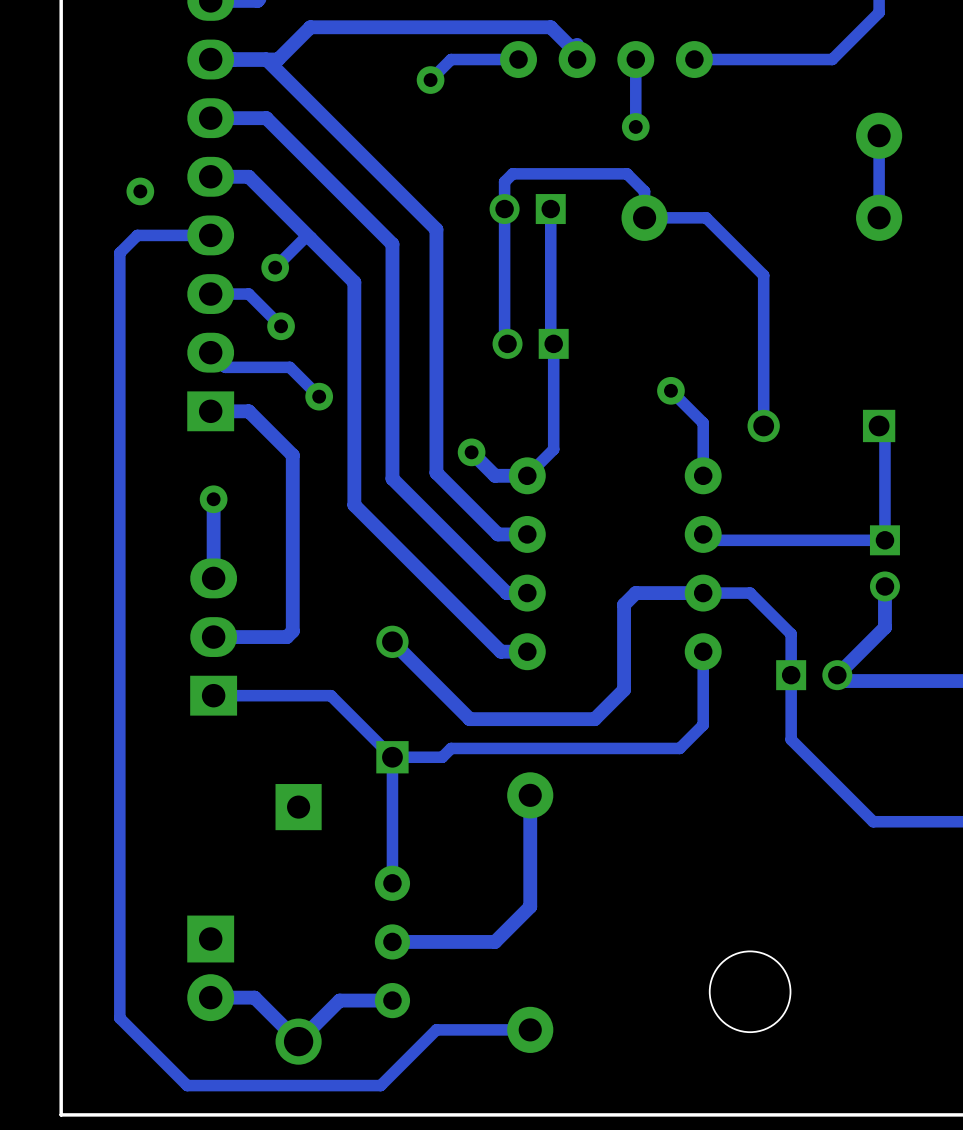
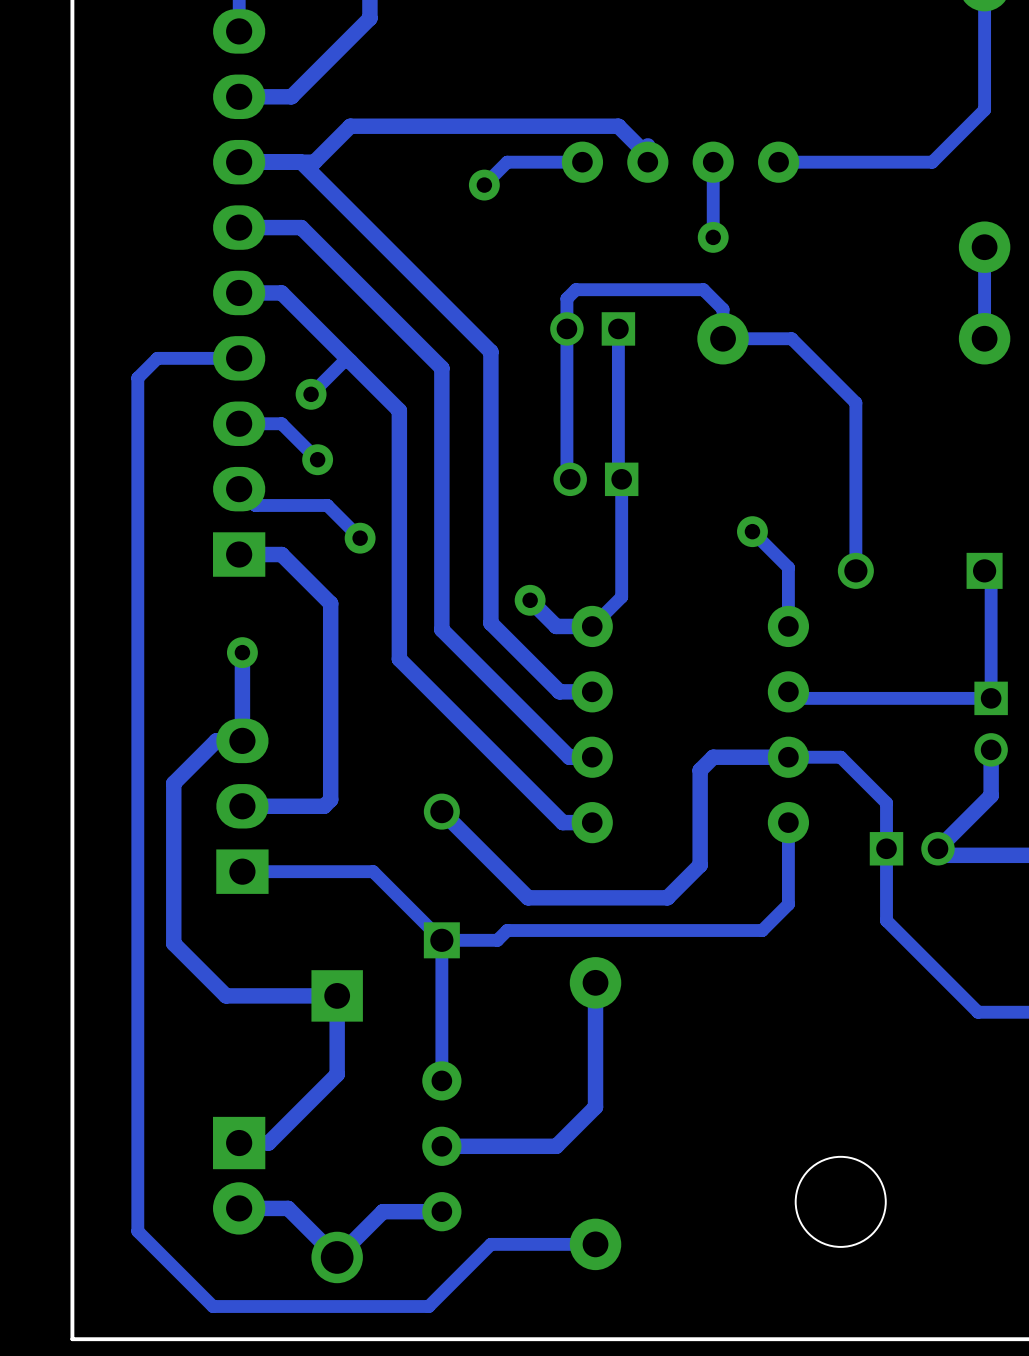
via: (140, 191) -> none
track: none -> (242, 740) (216, 740) (173, 783) (173, 943) (226, 995) (337, 995) (337, 1074) (268, 1143) (239, 1143) (242, 1143)

